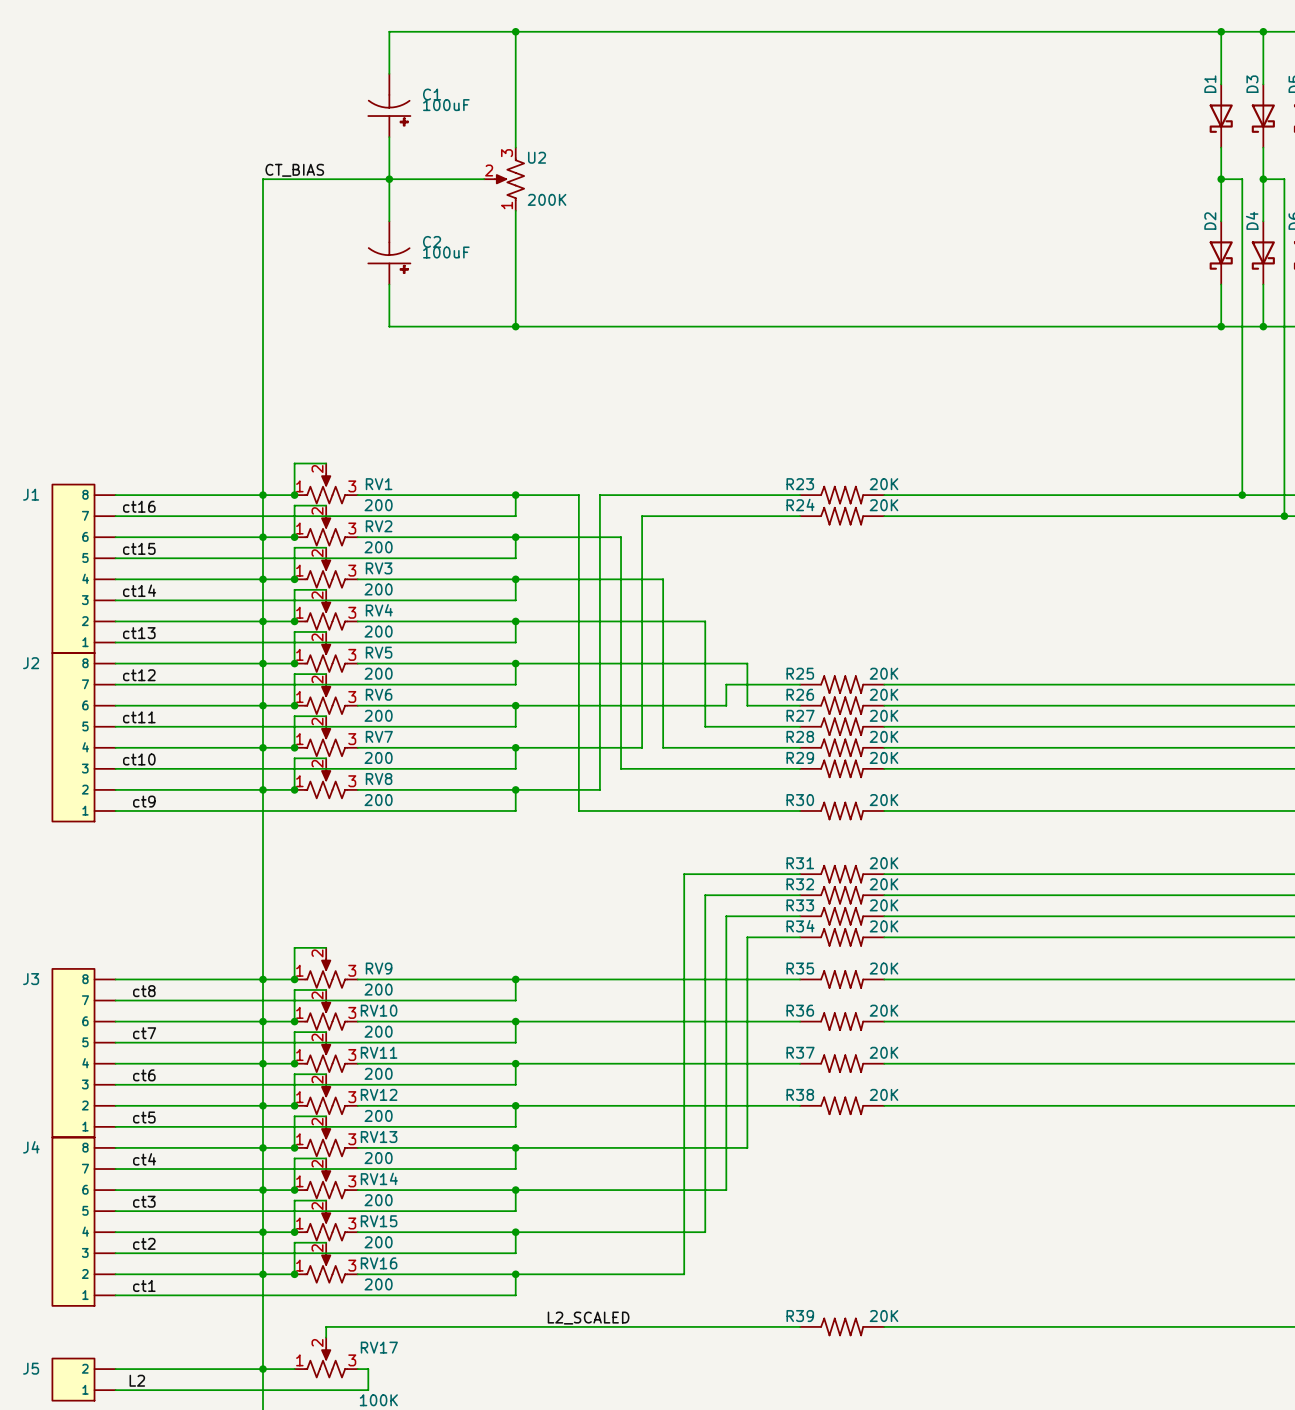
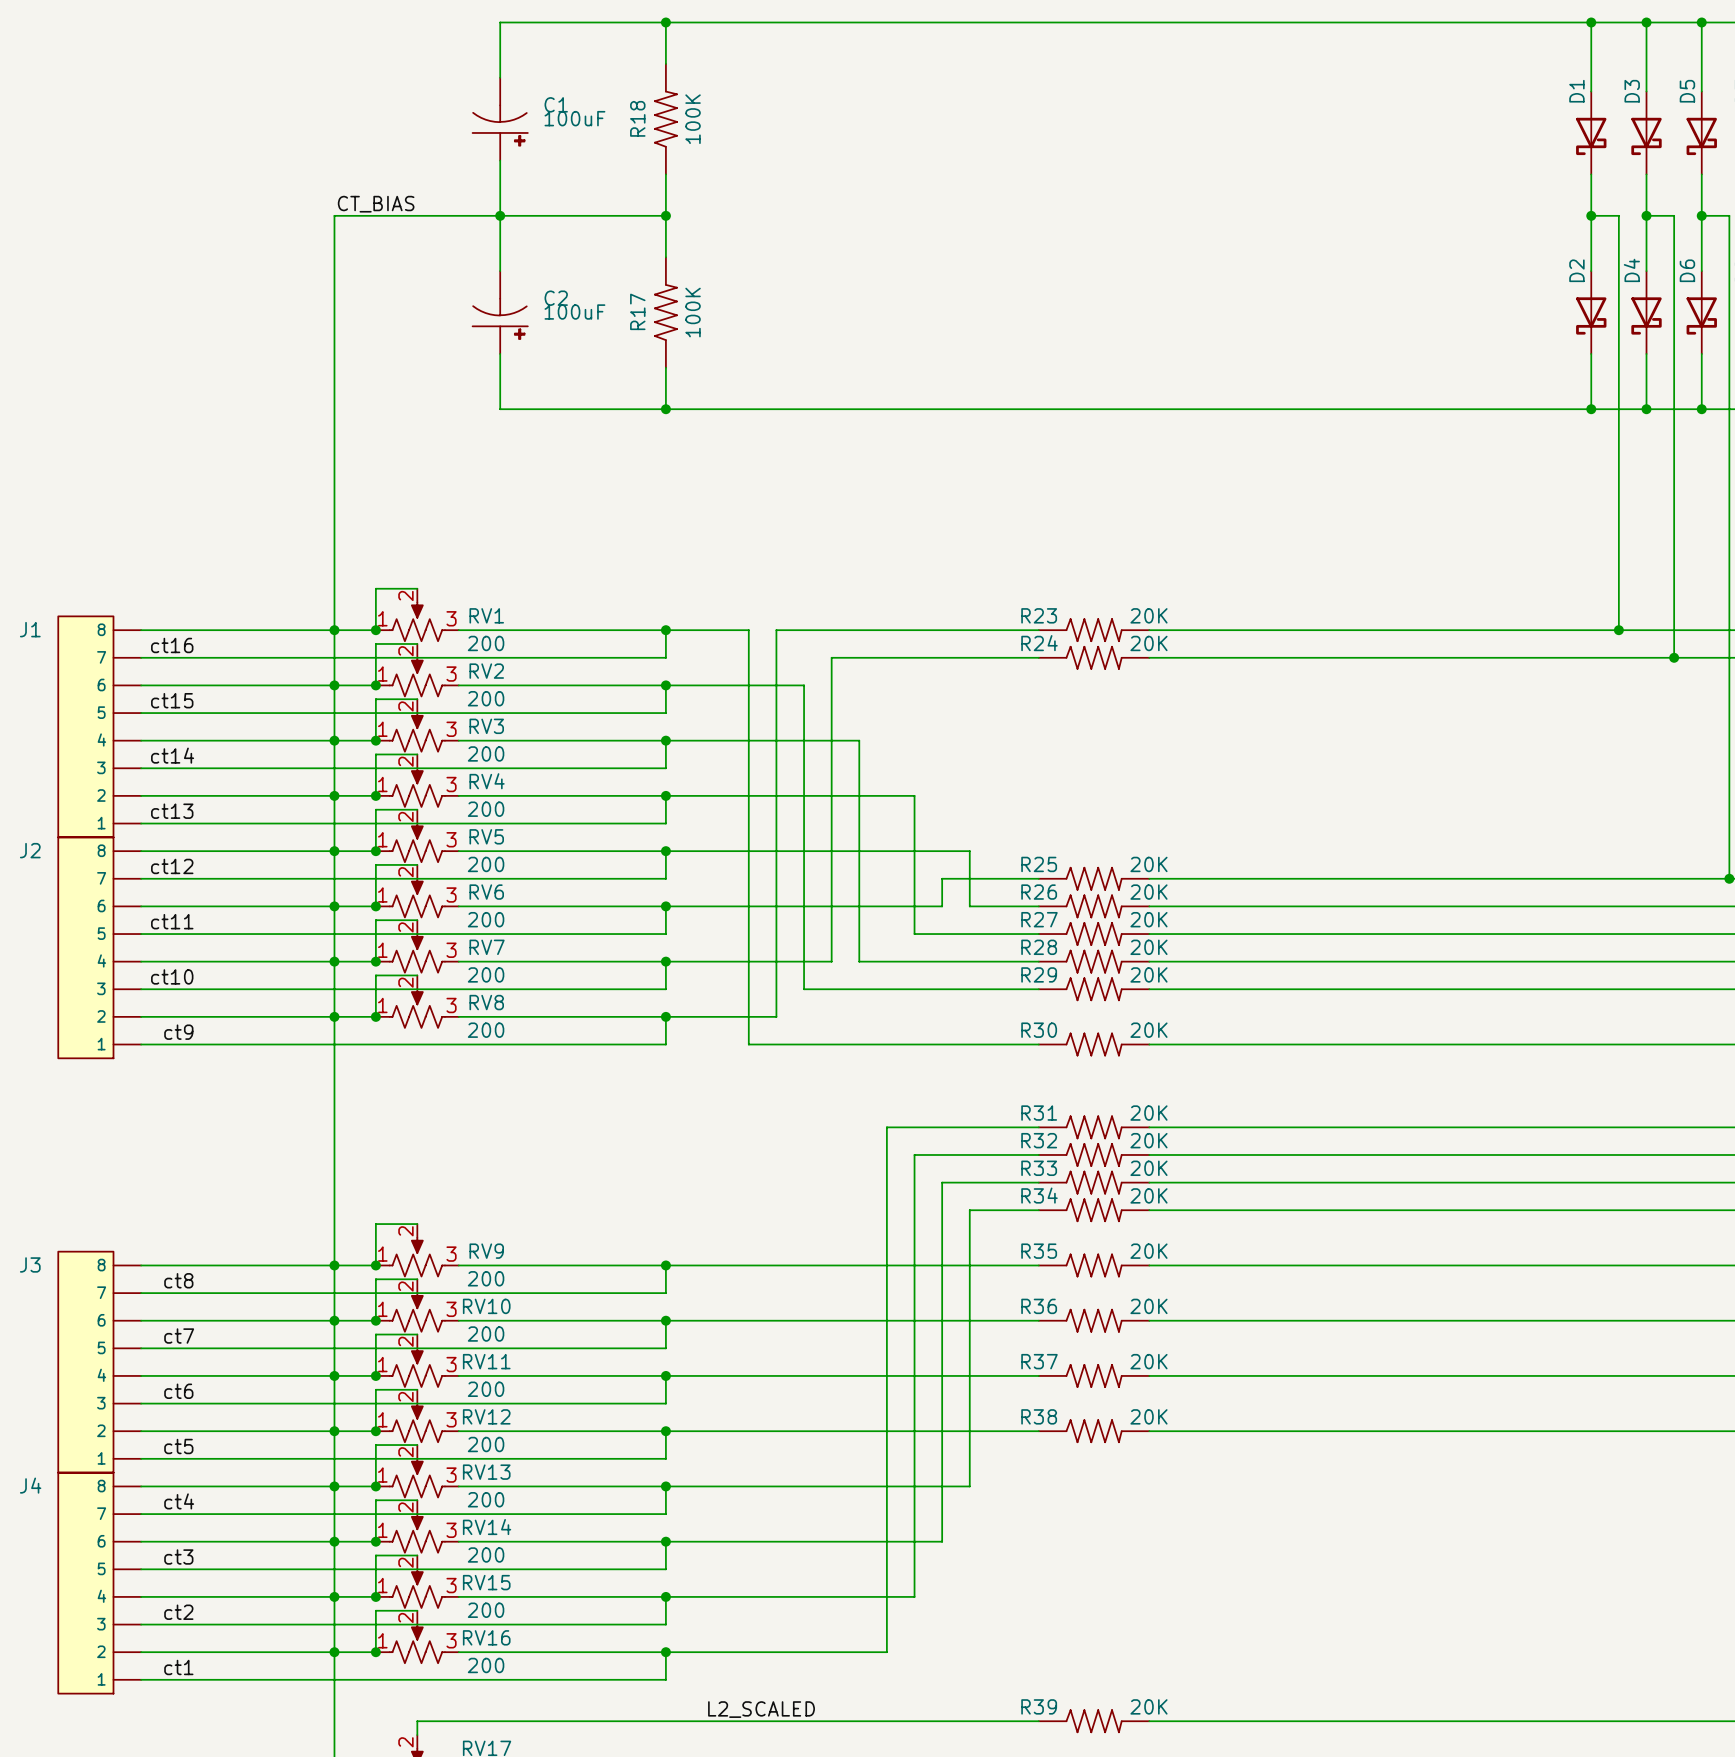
R18: none -> 100K (665, 119)
U2: 200K (504, 179) -> none
junction: none -> (665, 215)
R17: none -> 100K (665, 312)

